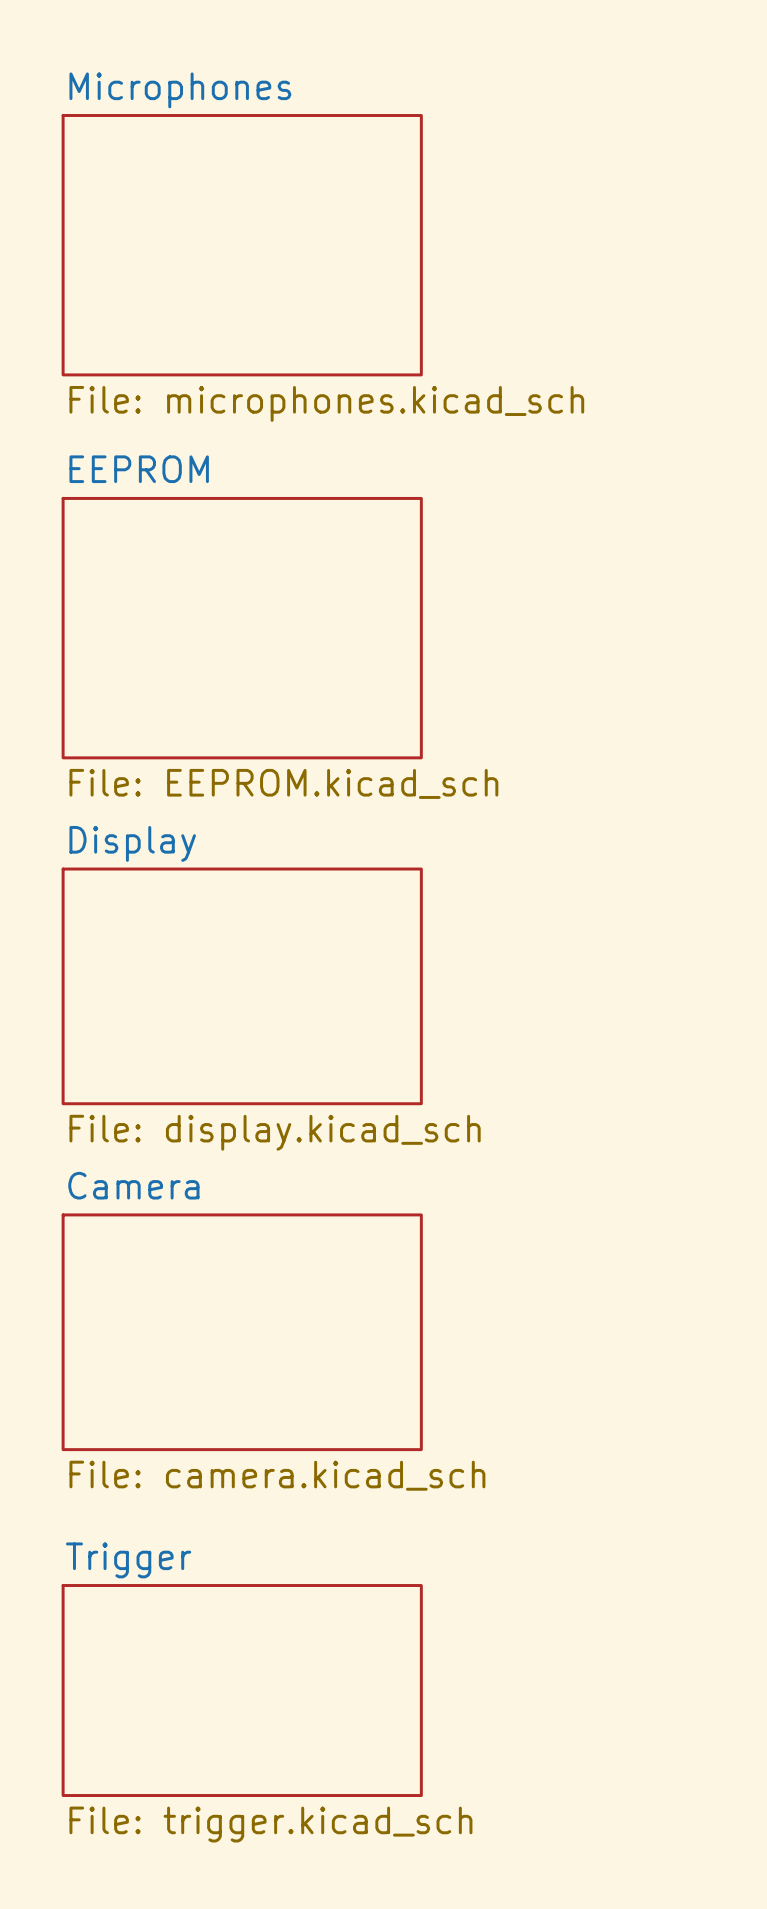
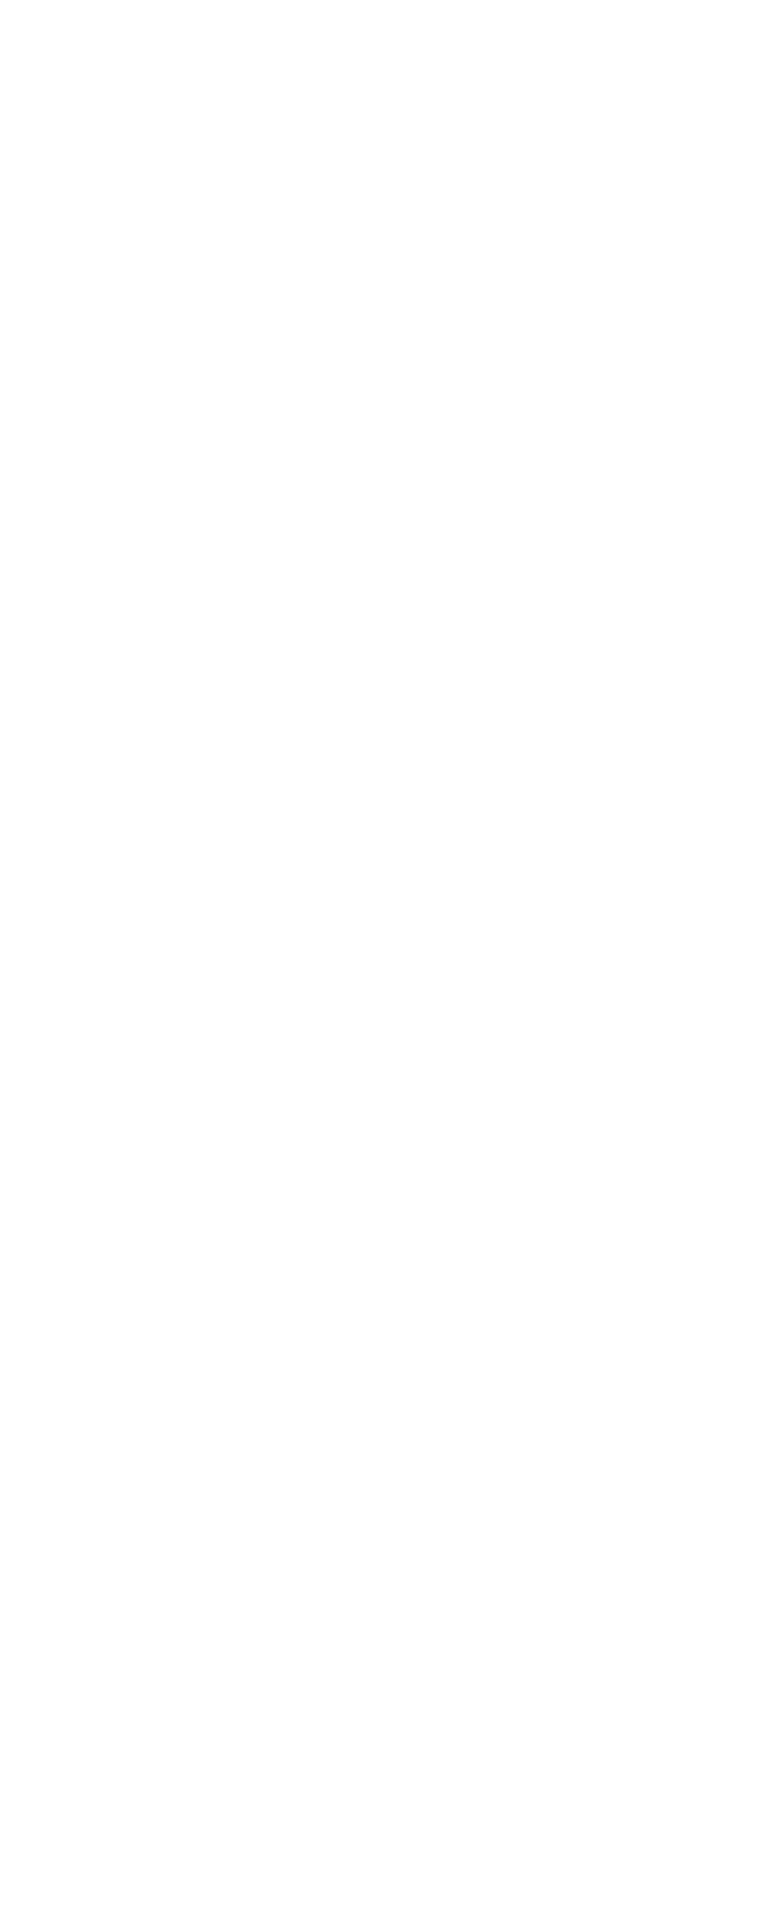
sheet Microphones: File: microphones.kicad_sch (242, 245) -> none
sheet EEPROM: File: EEPROM.kicad_sch (242, 628) -> none
sheet Display: File: display.kicad_sch (242, 986) -> none
sheet Camera: File: camera.kicad_sch (242, 1332) -> none
sheet Trigger: File: trigger.kicad_sch (242, 1690) -> none

